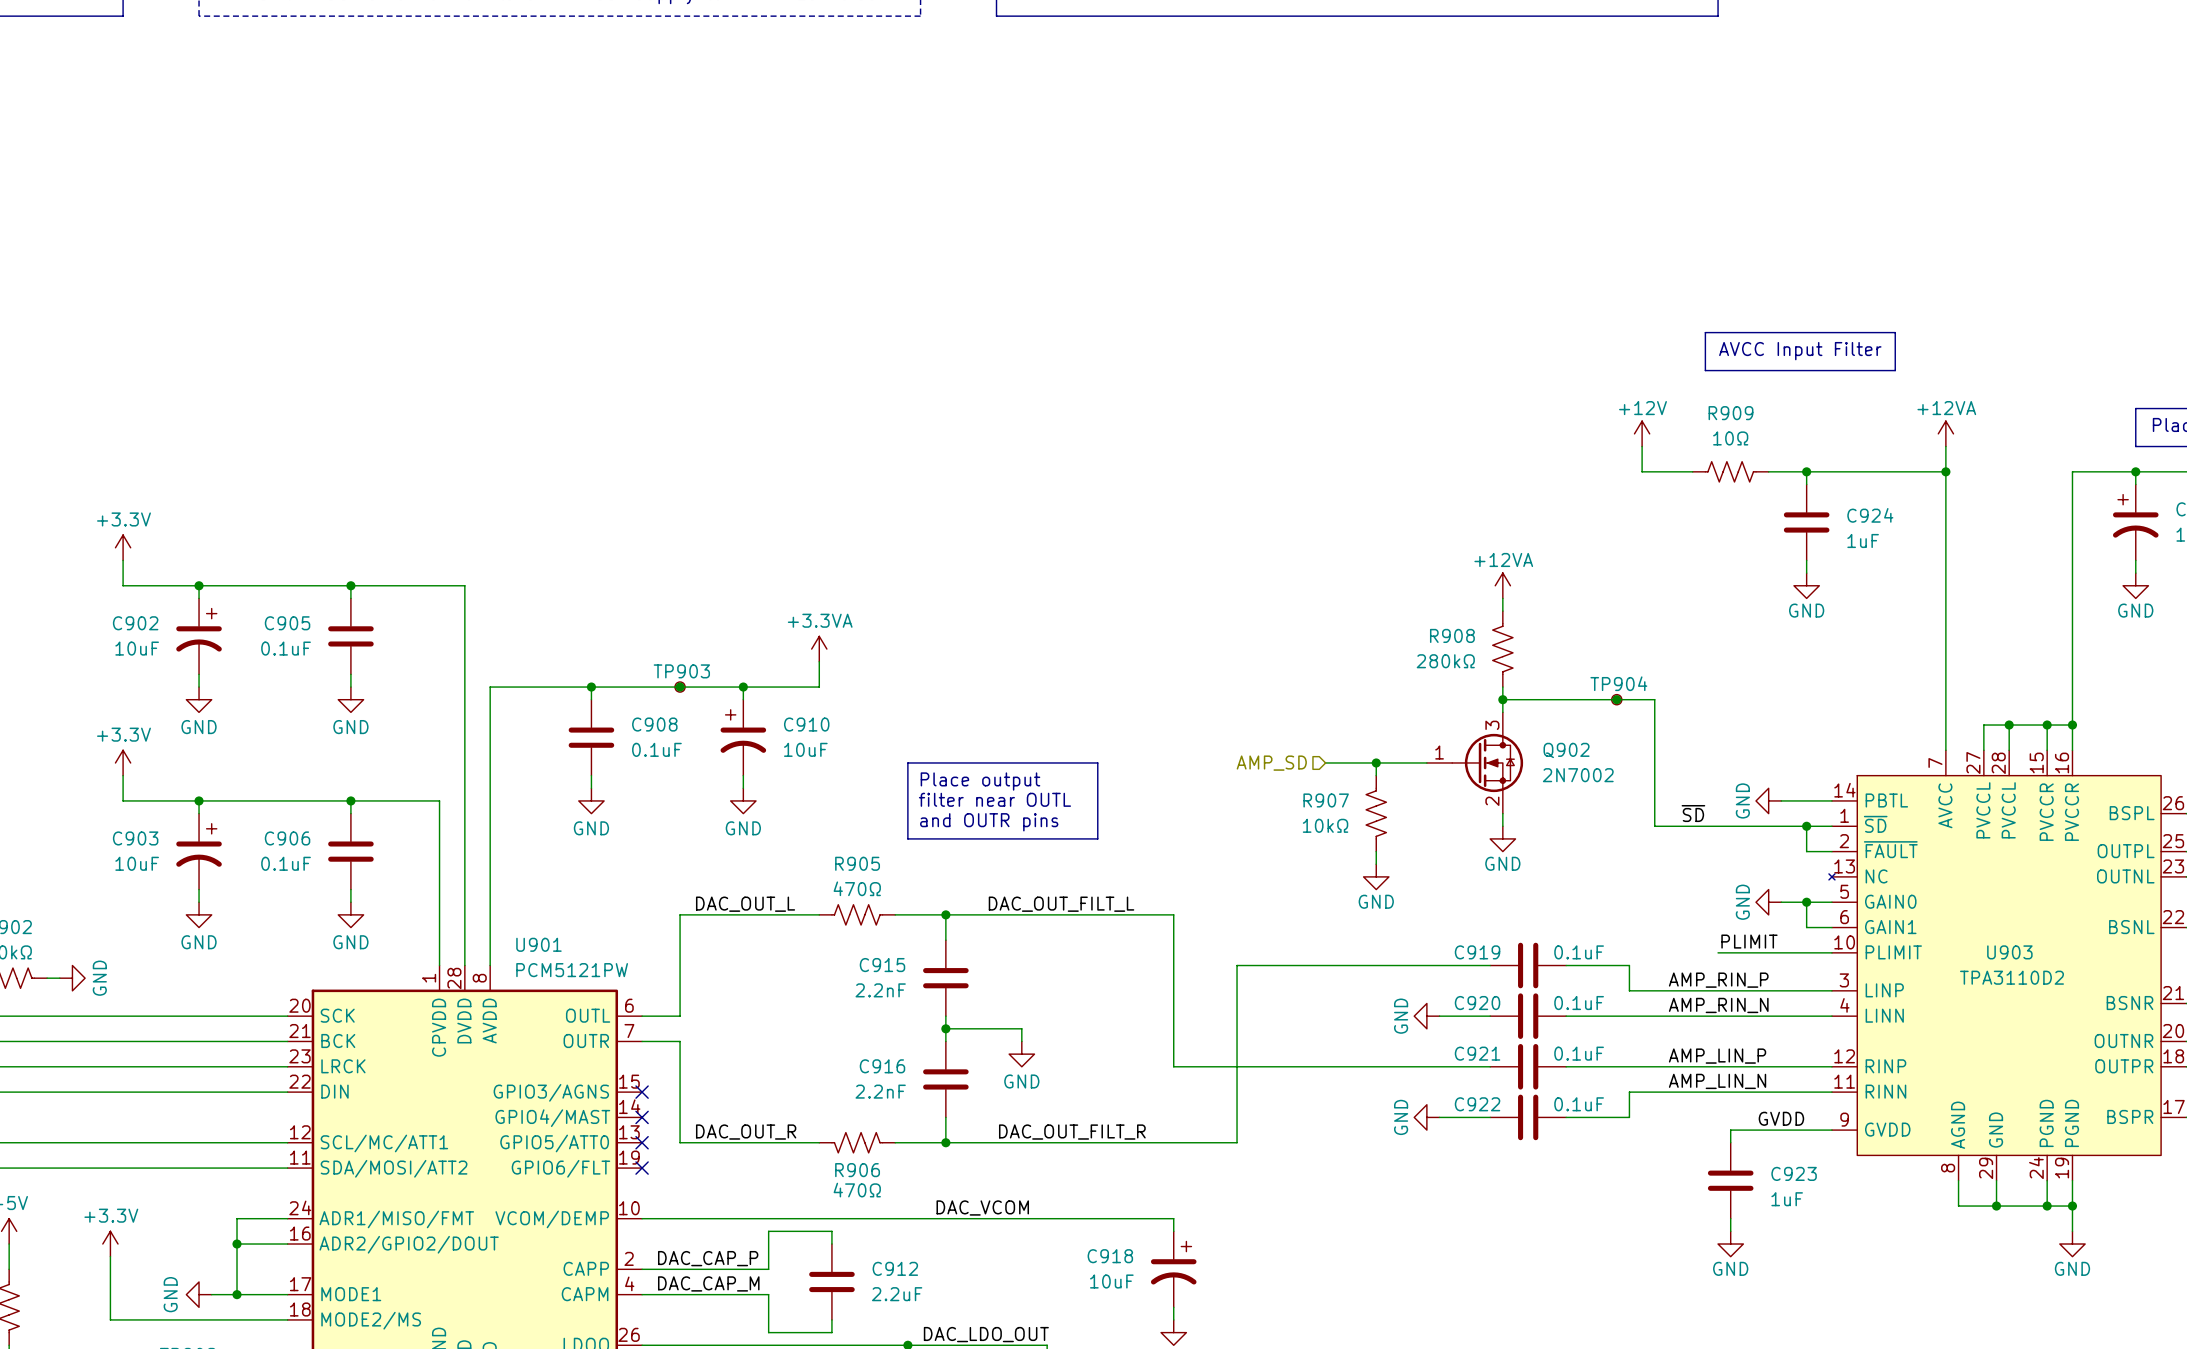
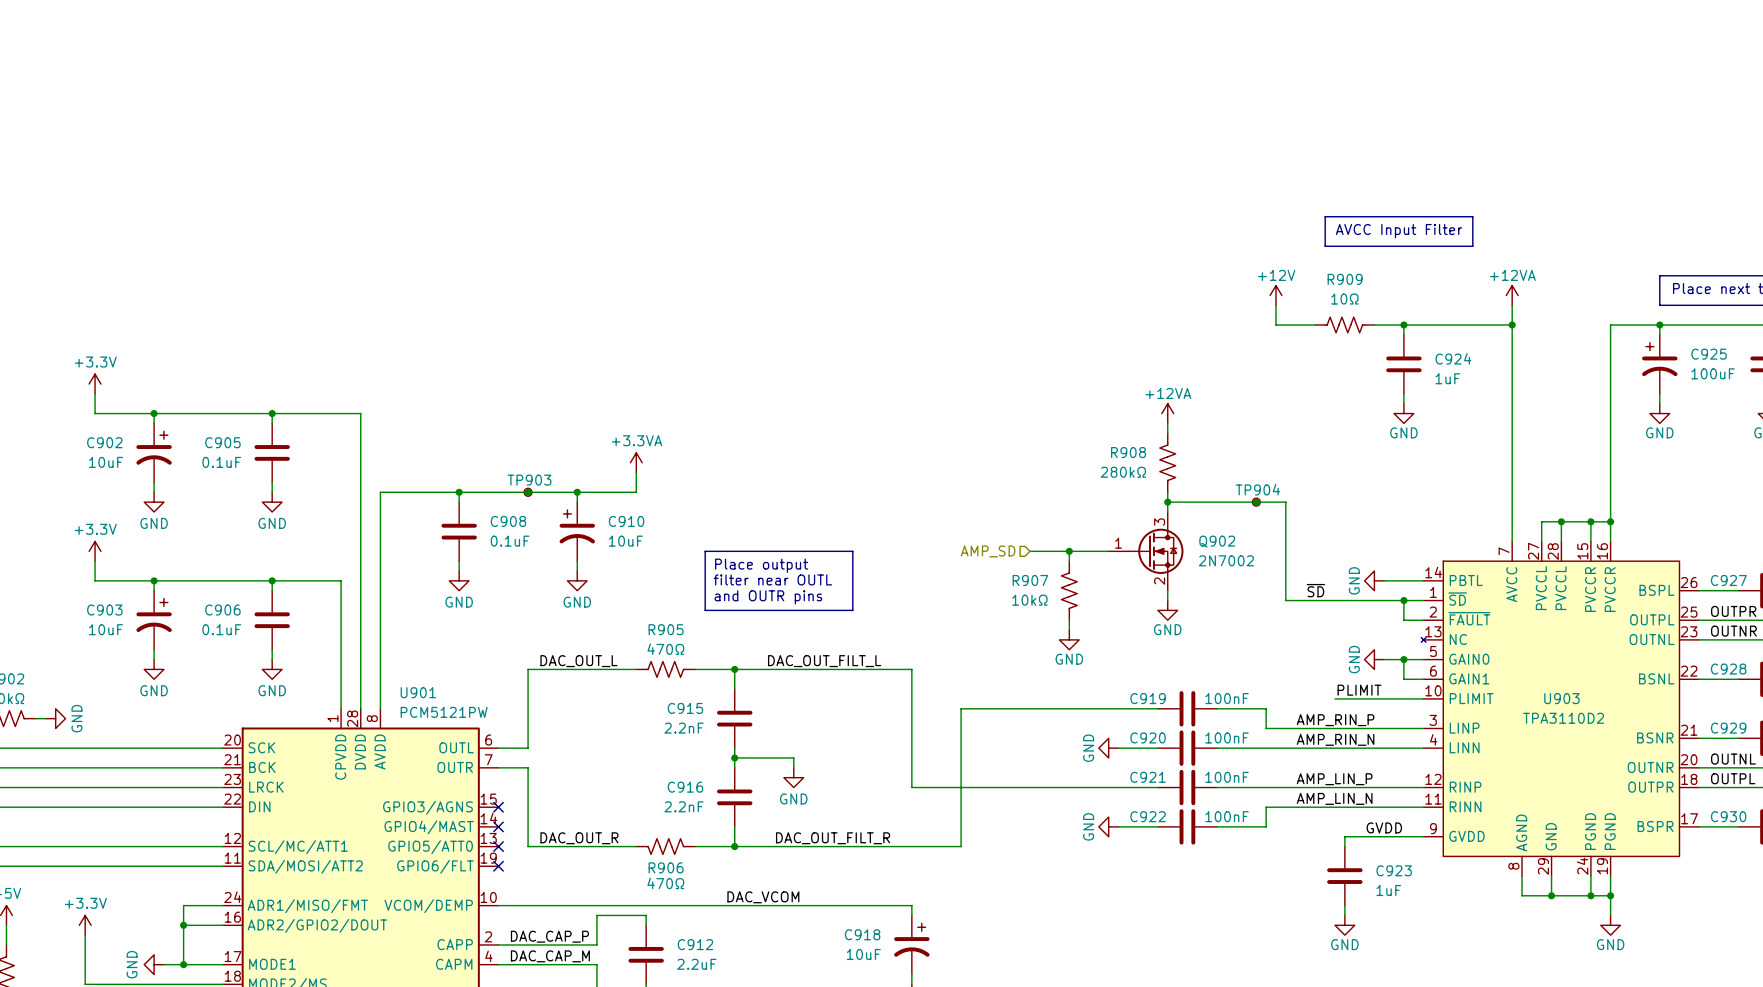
C919 value: 0.1uF (1579, 952) -> 100nF (1227, 698)
C920 value: 0.1uF (1579, 1003) -> 100nF (1227, 737)
C921 value: 0.1uF (1579, 1053) -> 100nF (1227, 777)
C922 value: 0.1uF (1579, 1104) -> 100nF (1227, 816)

